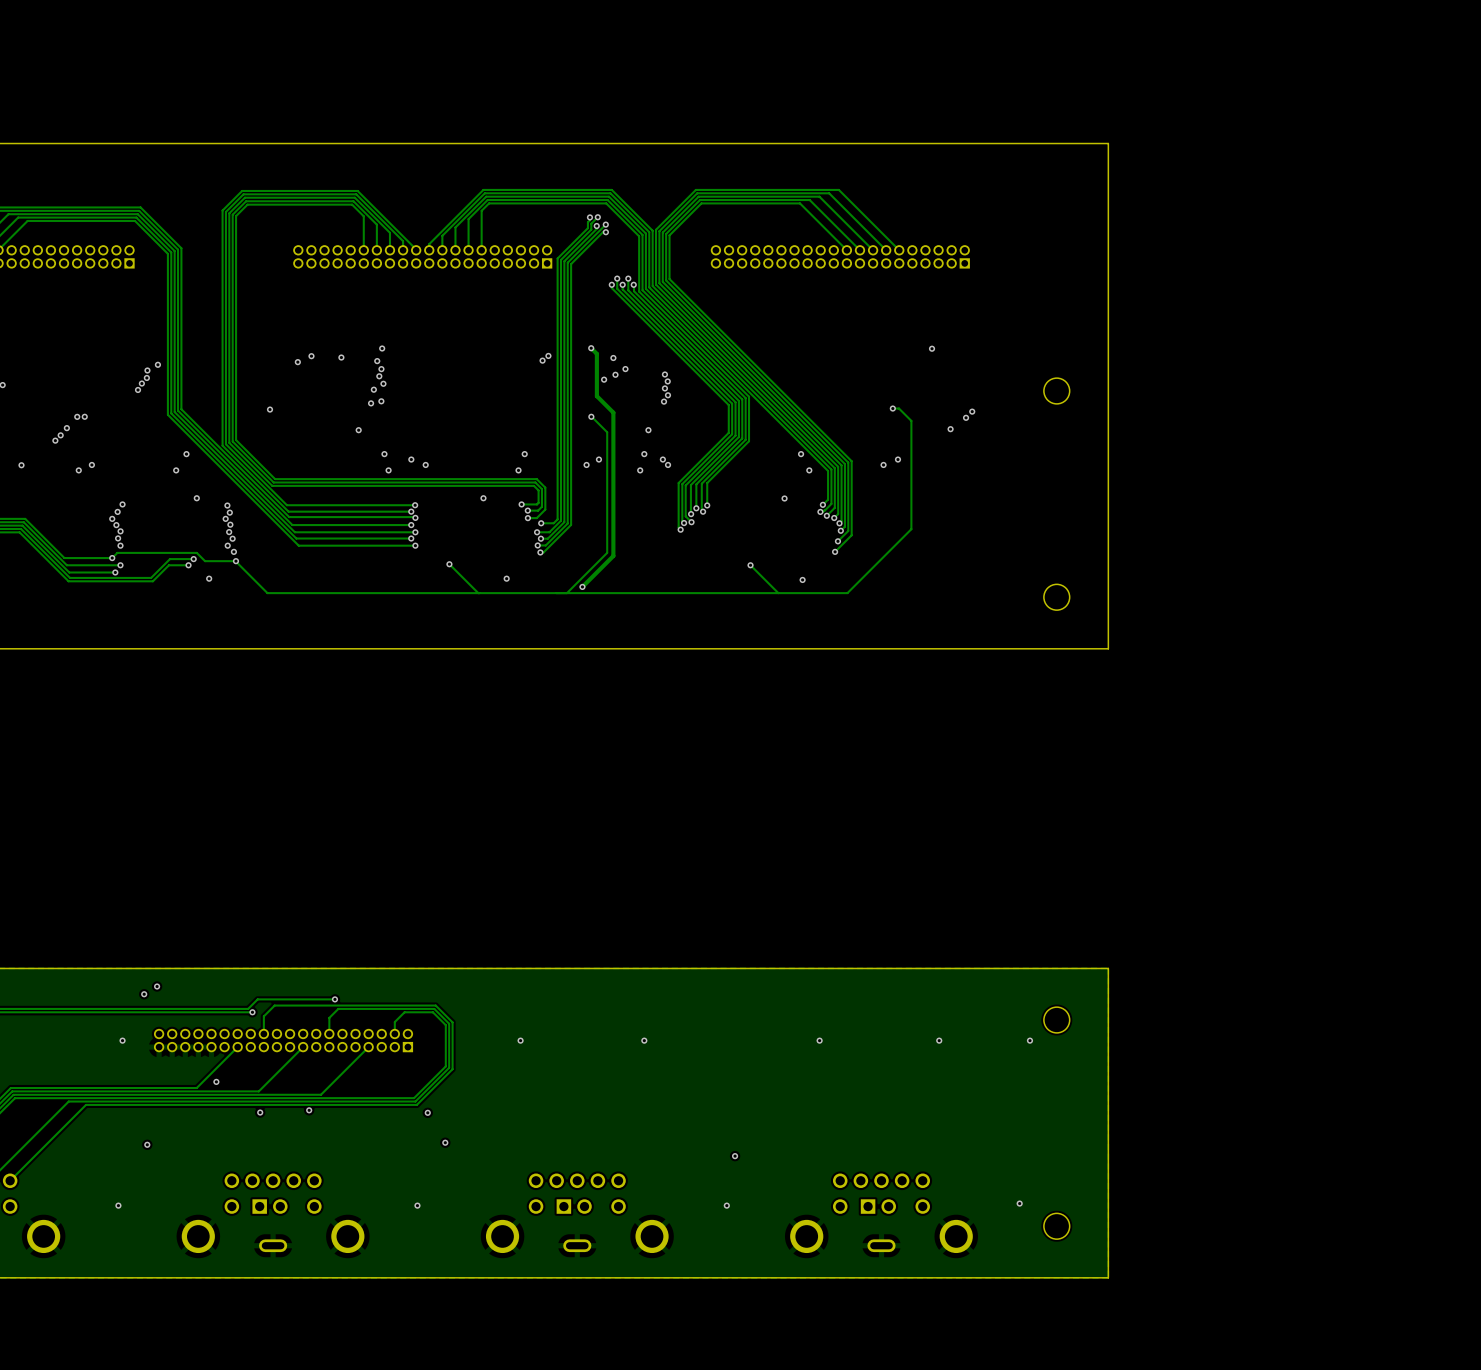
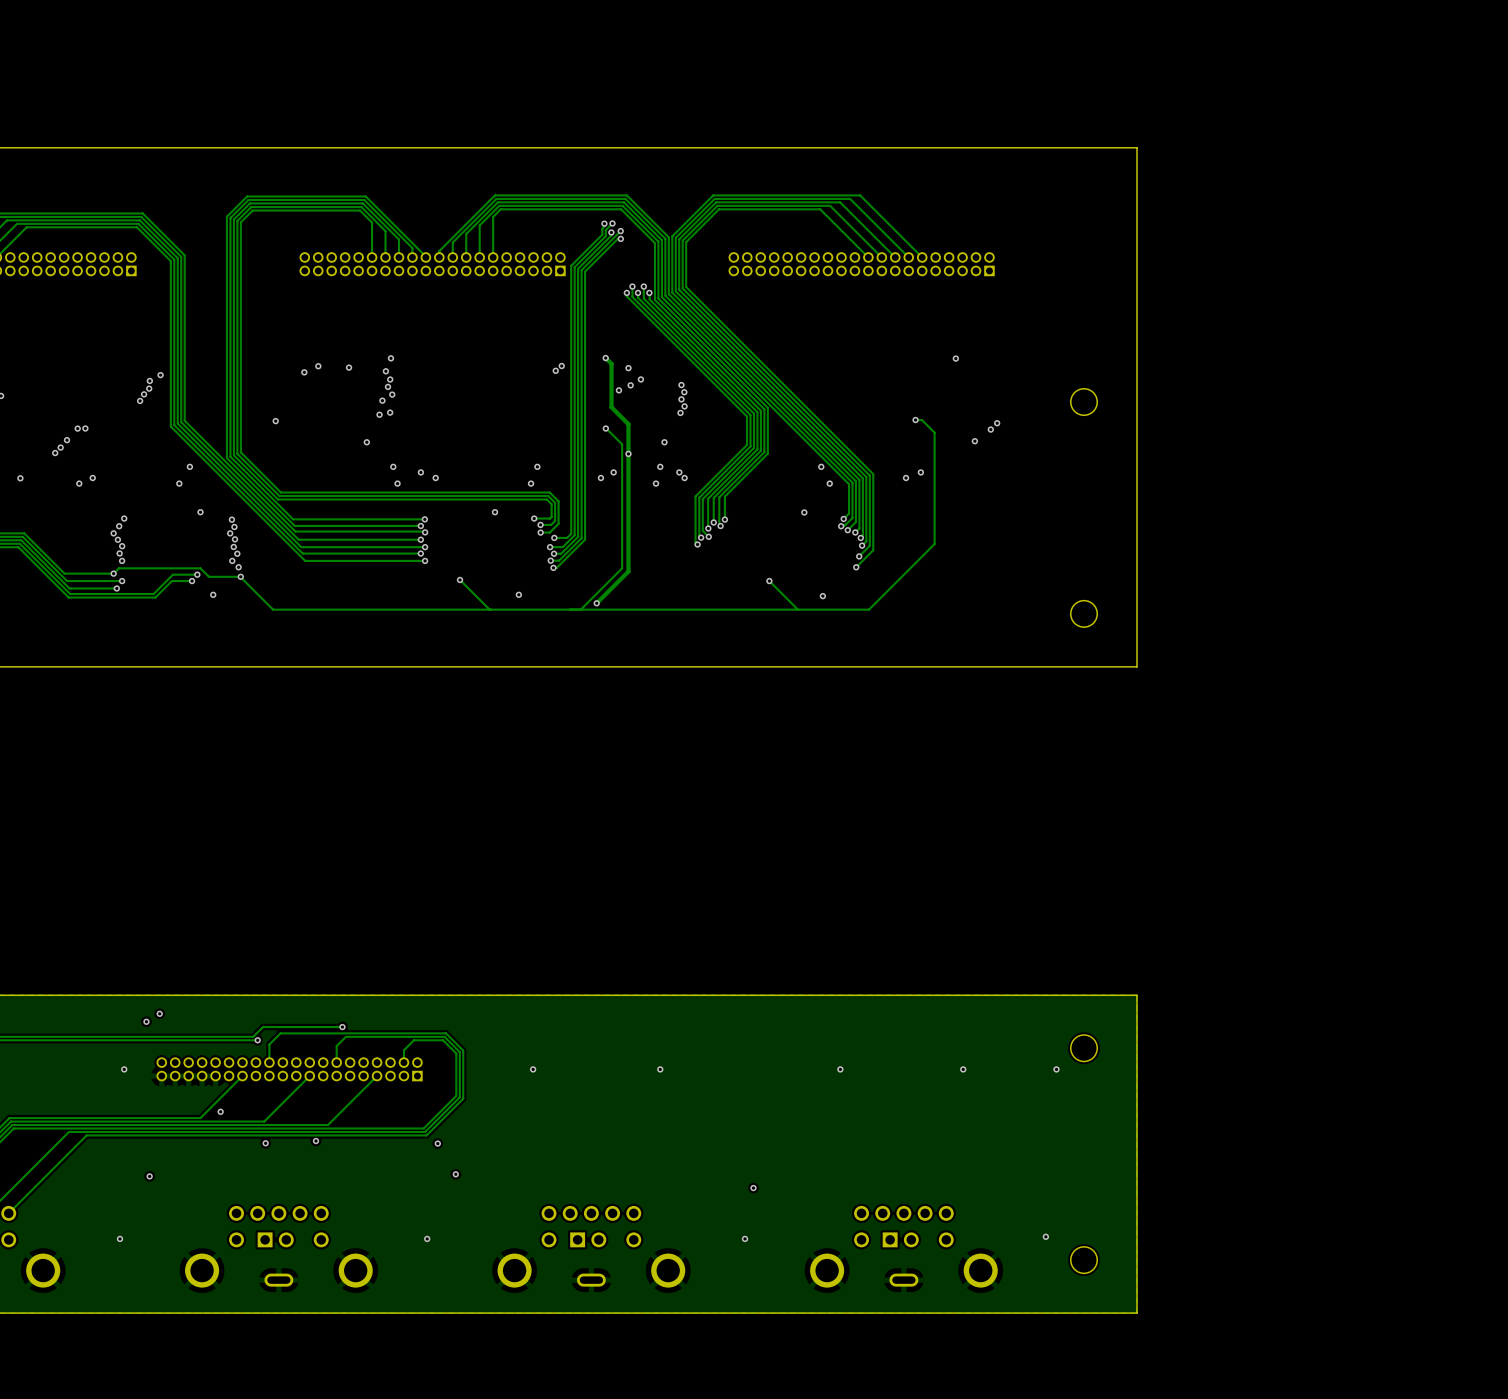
via: none -> (628, 453)

